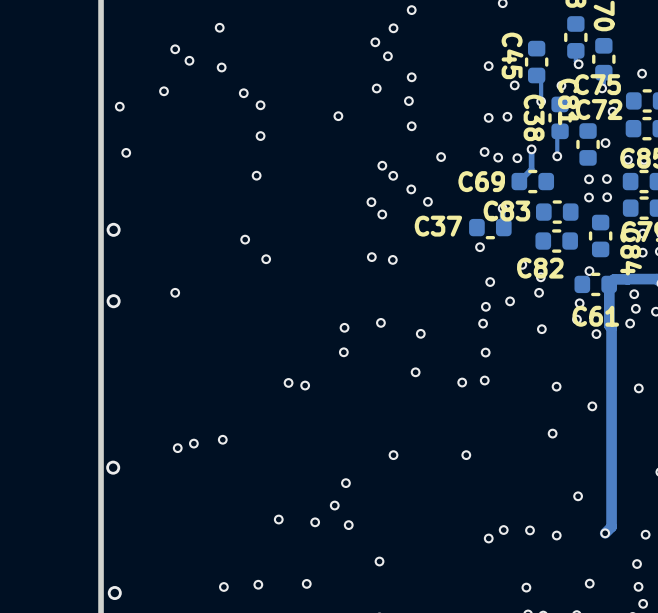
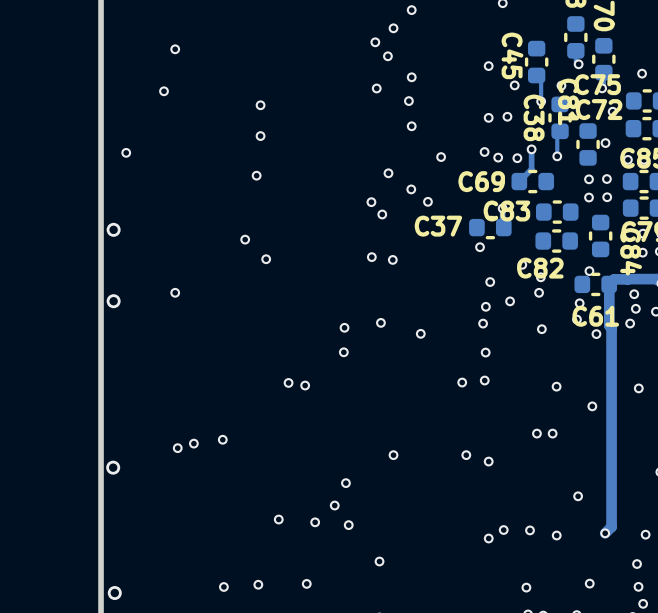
via: (219, 27) -> none
via: (189, 60) -> none
via: (221, 67) -> none
via: (243, 93) -> none
via: (119, 106) -> none
via: (338, 116) -> none
via: (382, 165) -> none
via: none -> (388, 173)
via: (393, 175) -> none
via: (415, 372) -> none
via: none -> (536, 433)
via: none -> (488, 461)

